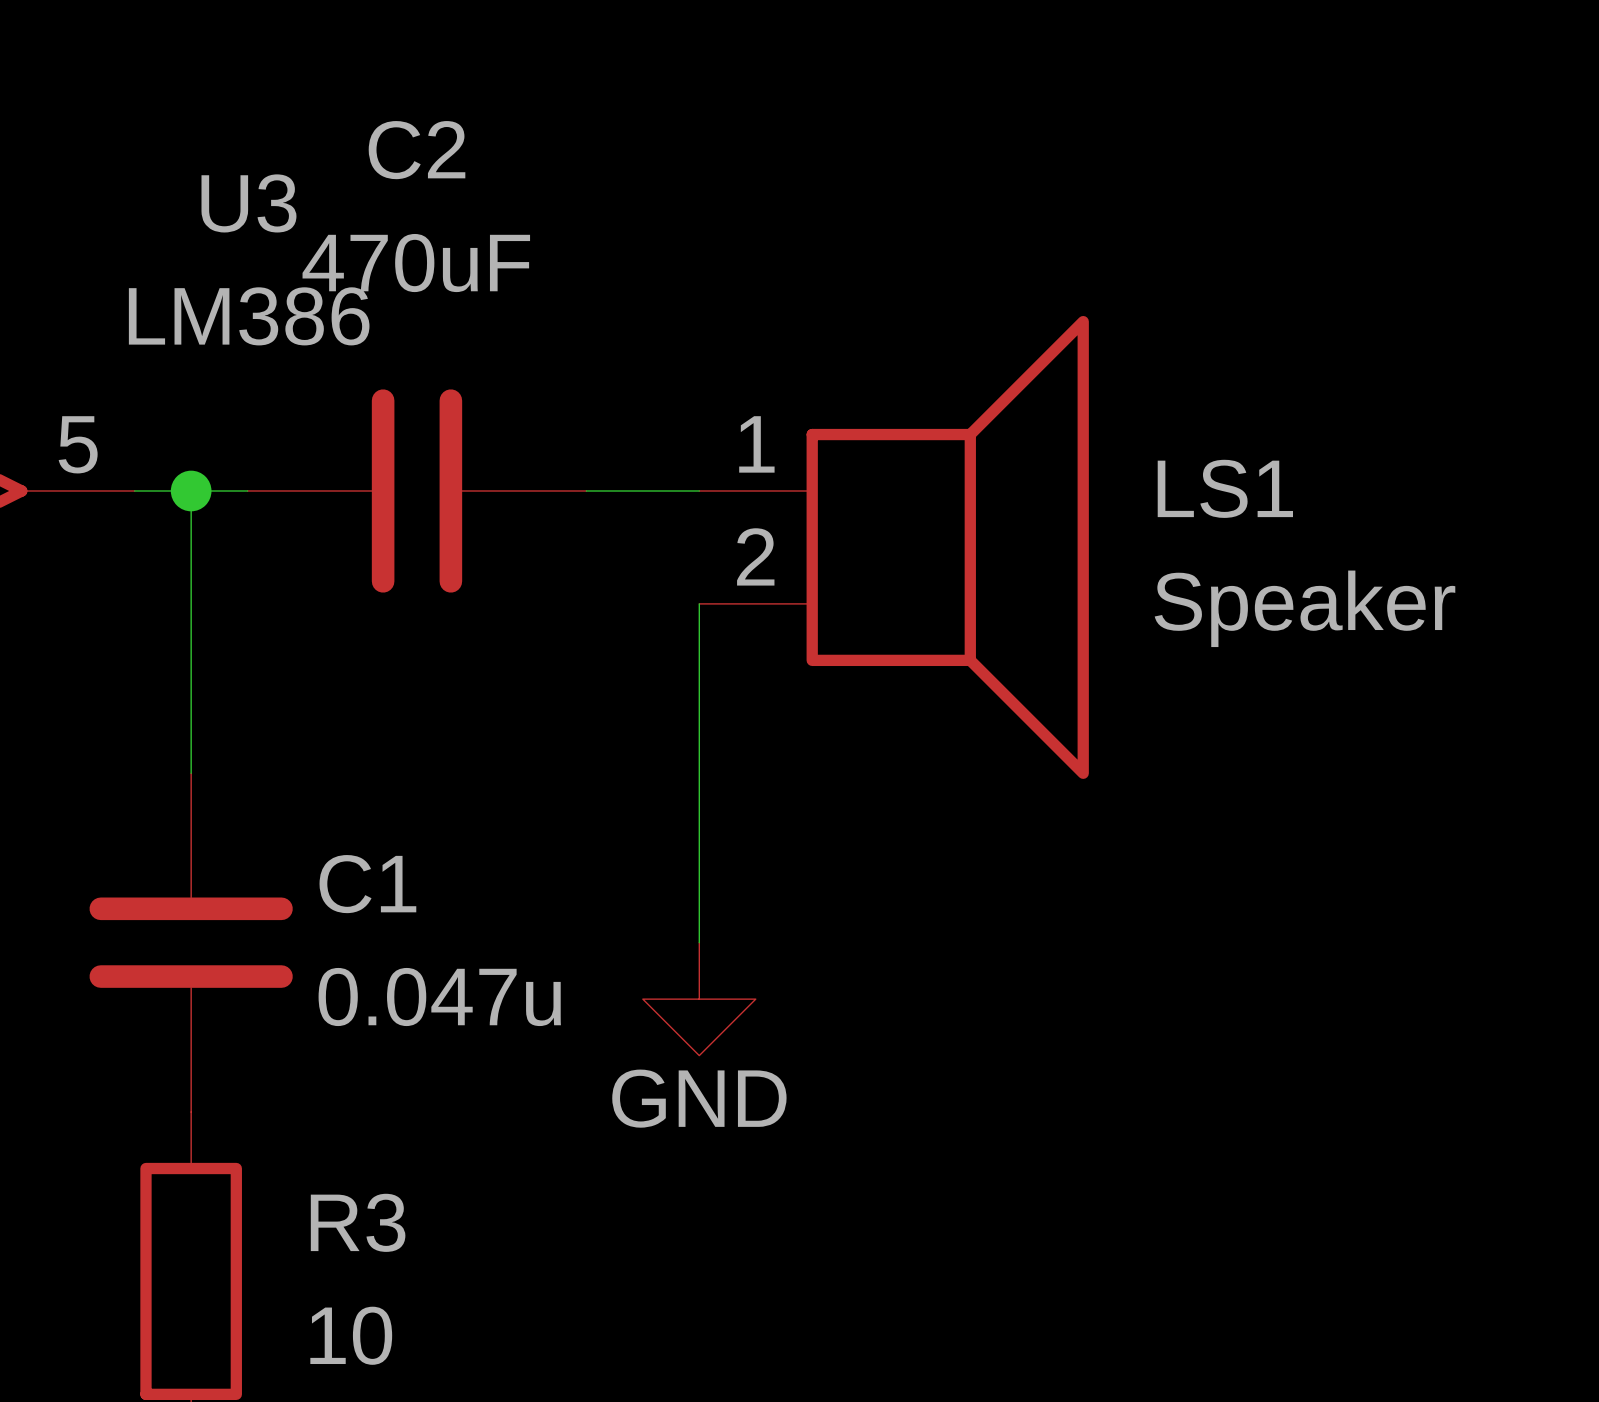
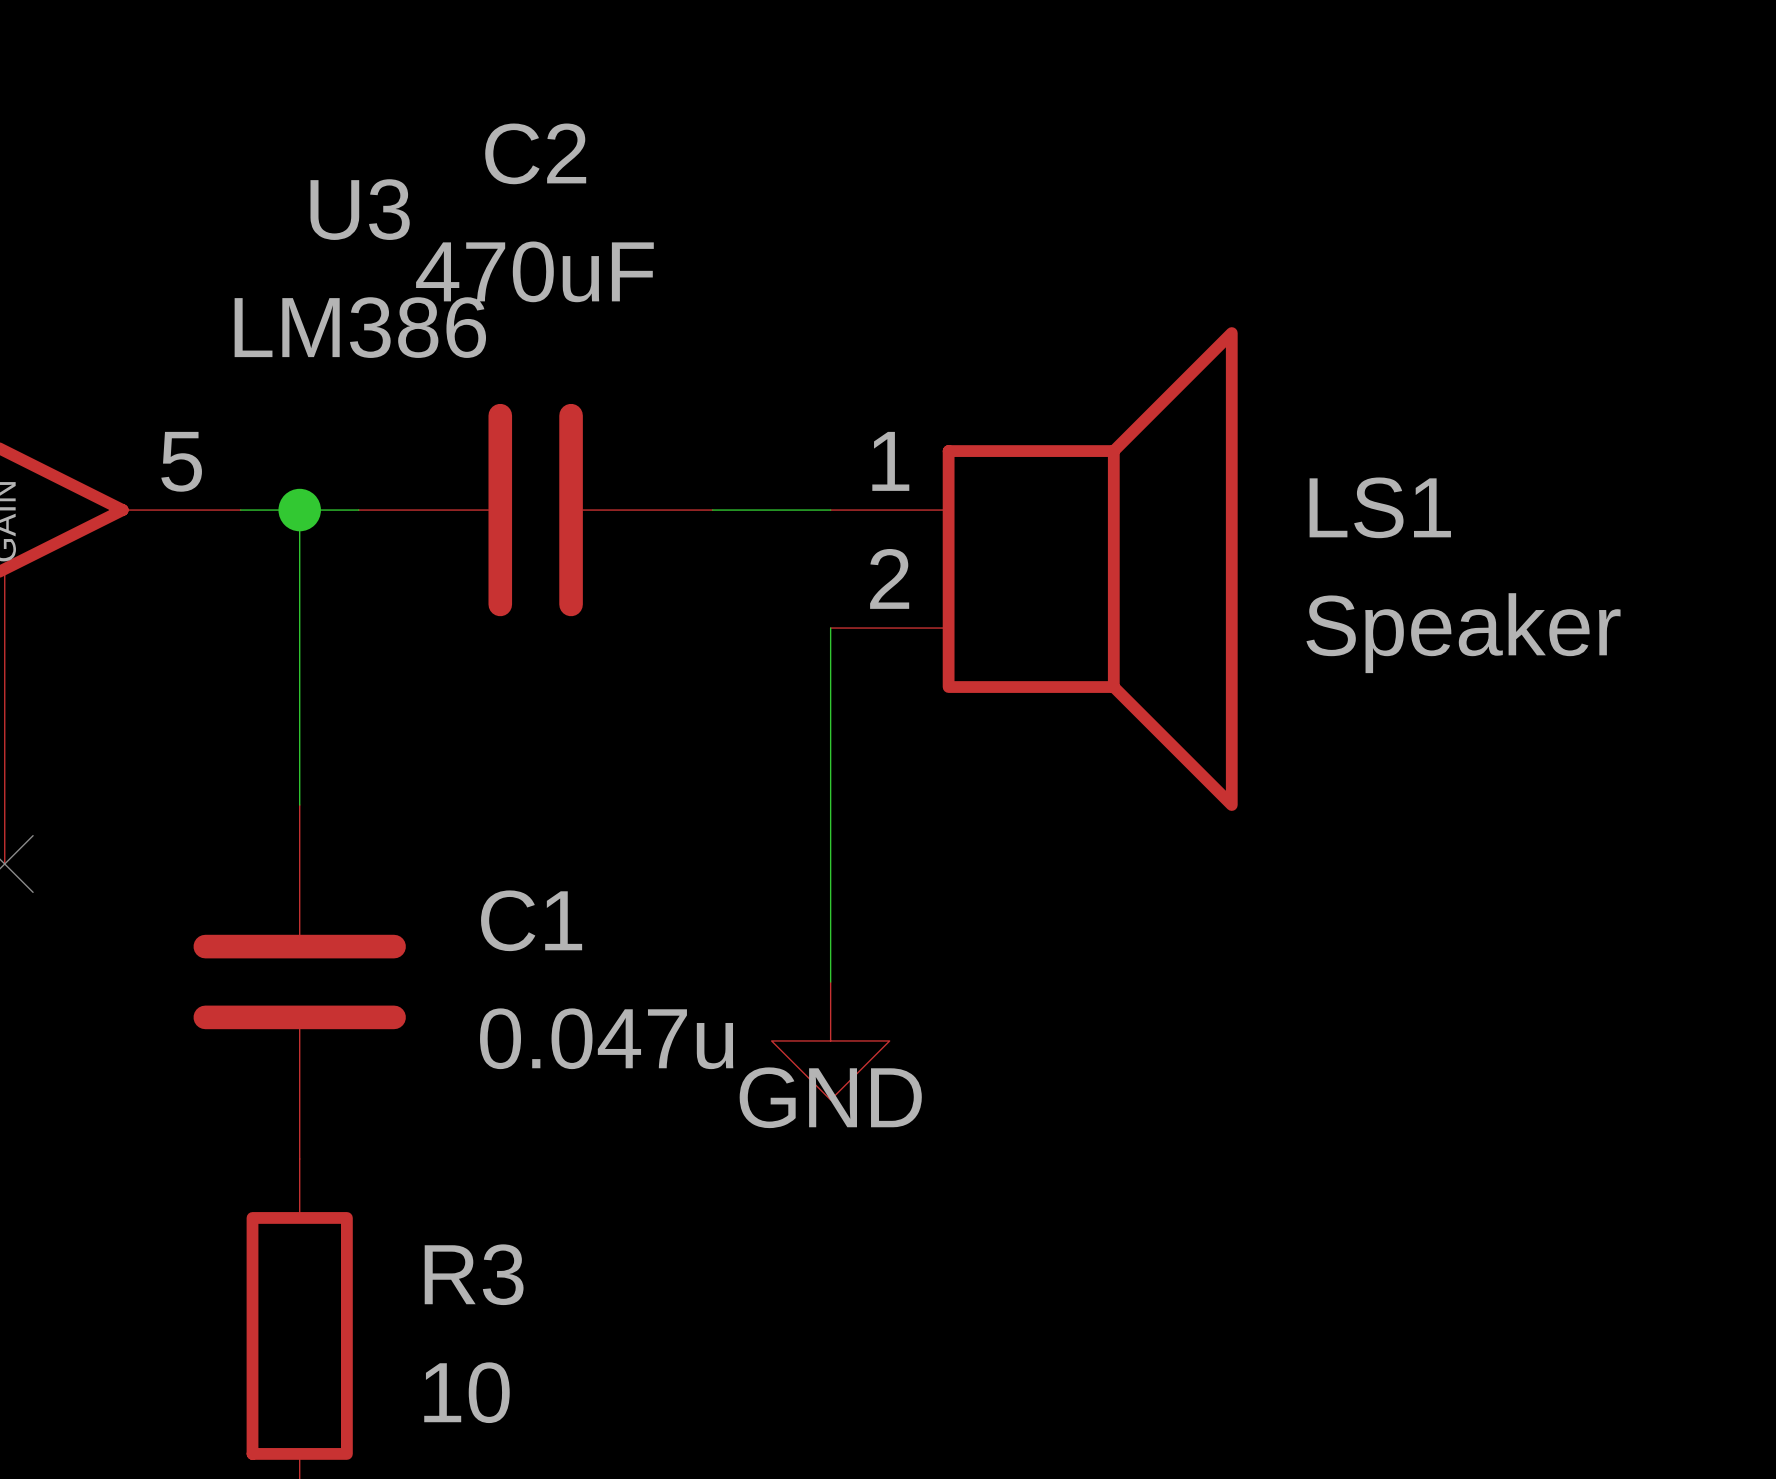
C1 name position: C1 (367, 884) -> C1 (531, 920)
C1 value position: 0.047u (439, 997) -> 0.047u (606, 1038)
power symbol text position: GND (699, 1098) -> GND (830, 1097)

